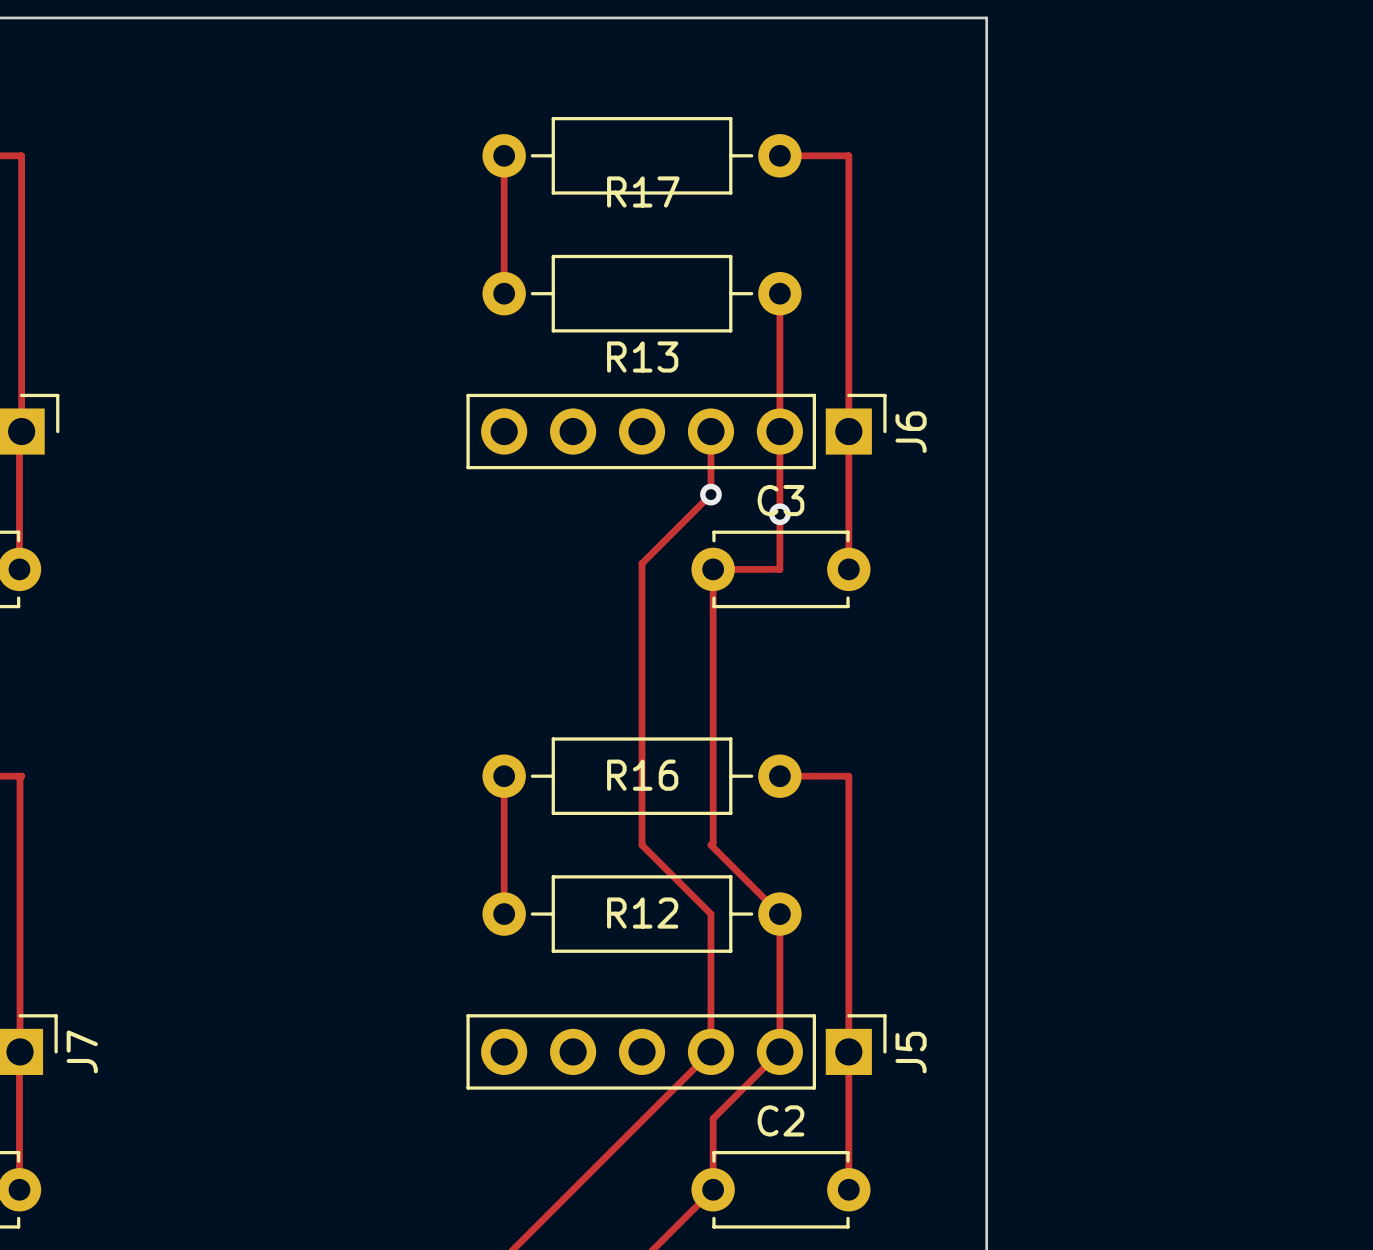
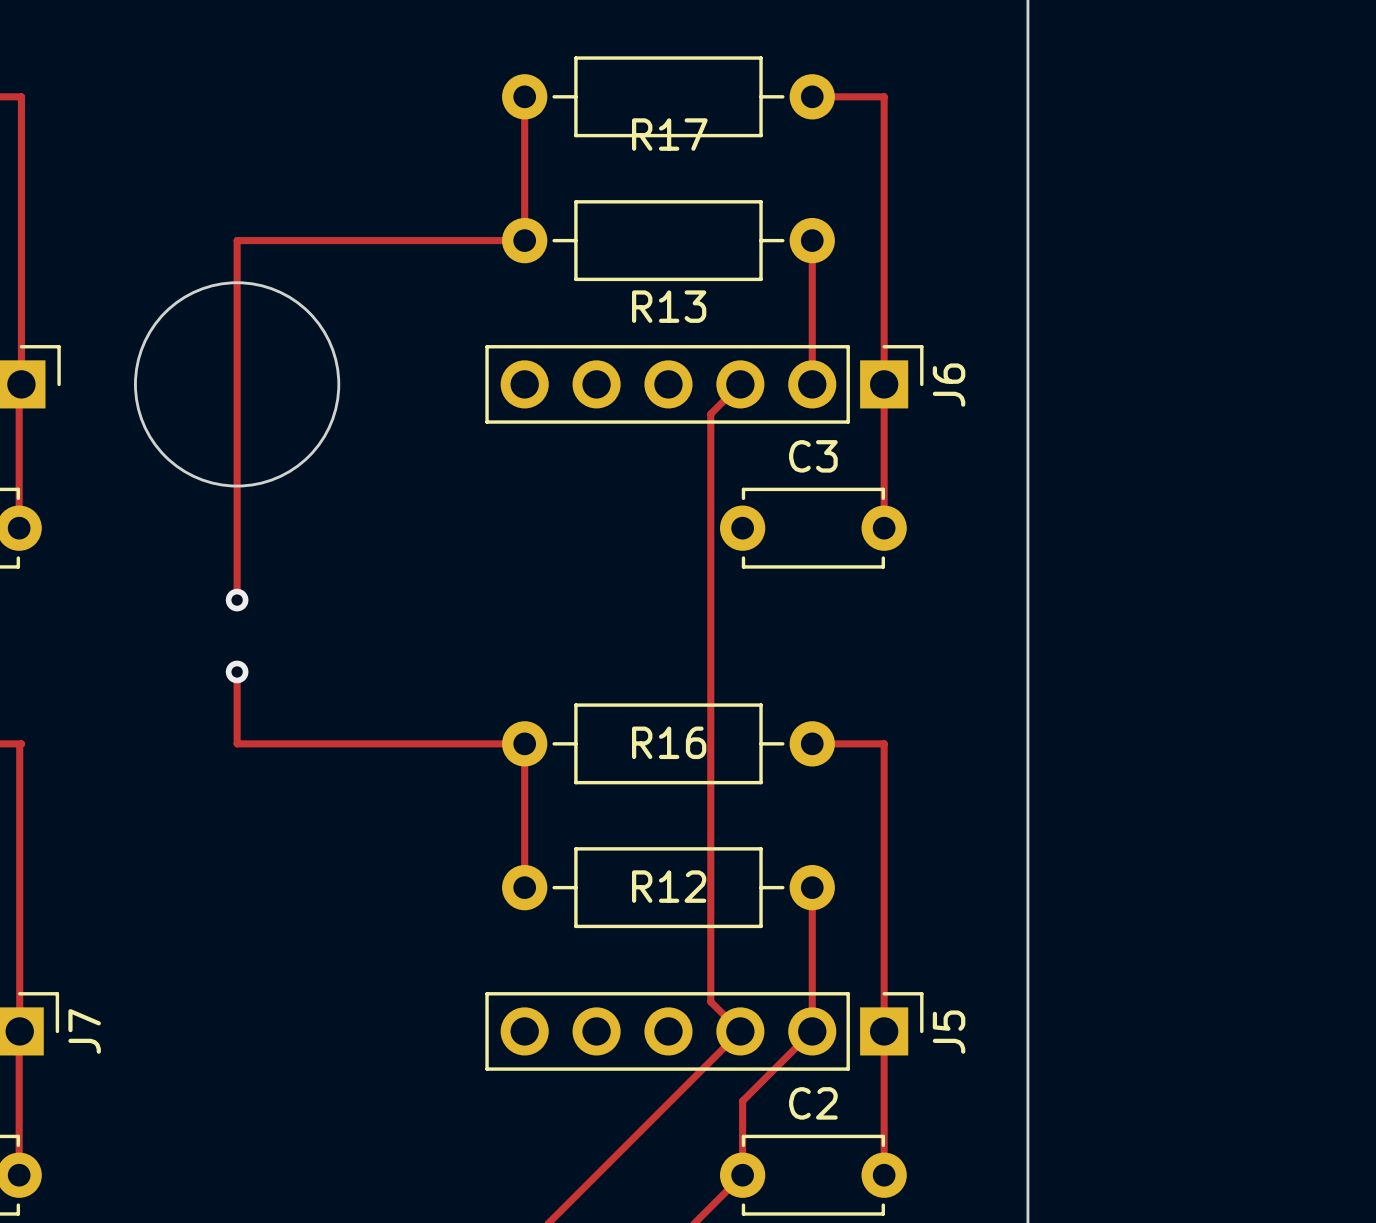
track: none -> (524, 240) (237, 240) (237, 600)
round board edge: none -> [134, 281, 341, 488]
track: (710, 431) (710, 494) (642, 563) (642, 845) (710, 914) (710, 1051) -> (740, 384) (710, 413) (710, 1001) (740, 1031)
track: (779, 431) (779, 569) (713, 569) (713, 842) (710, 845) (779, 914) -> none
via: (710, 494) -> none
via: (779, 514) -> none
via: none -> (237, 600)
track: none -> (237, 671) (237, 743) (524, 743)
via: none -> (237, 671)

